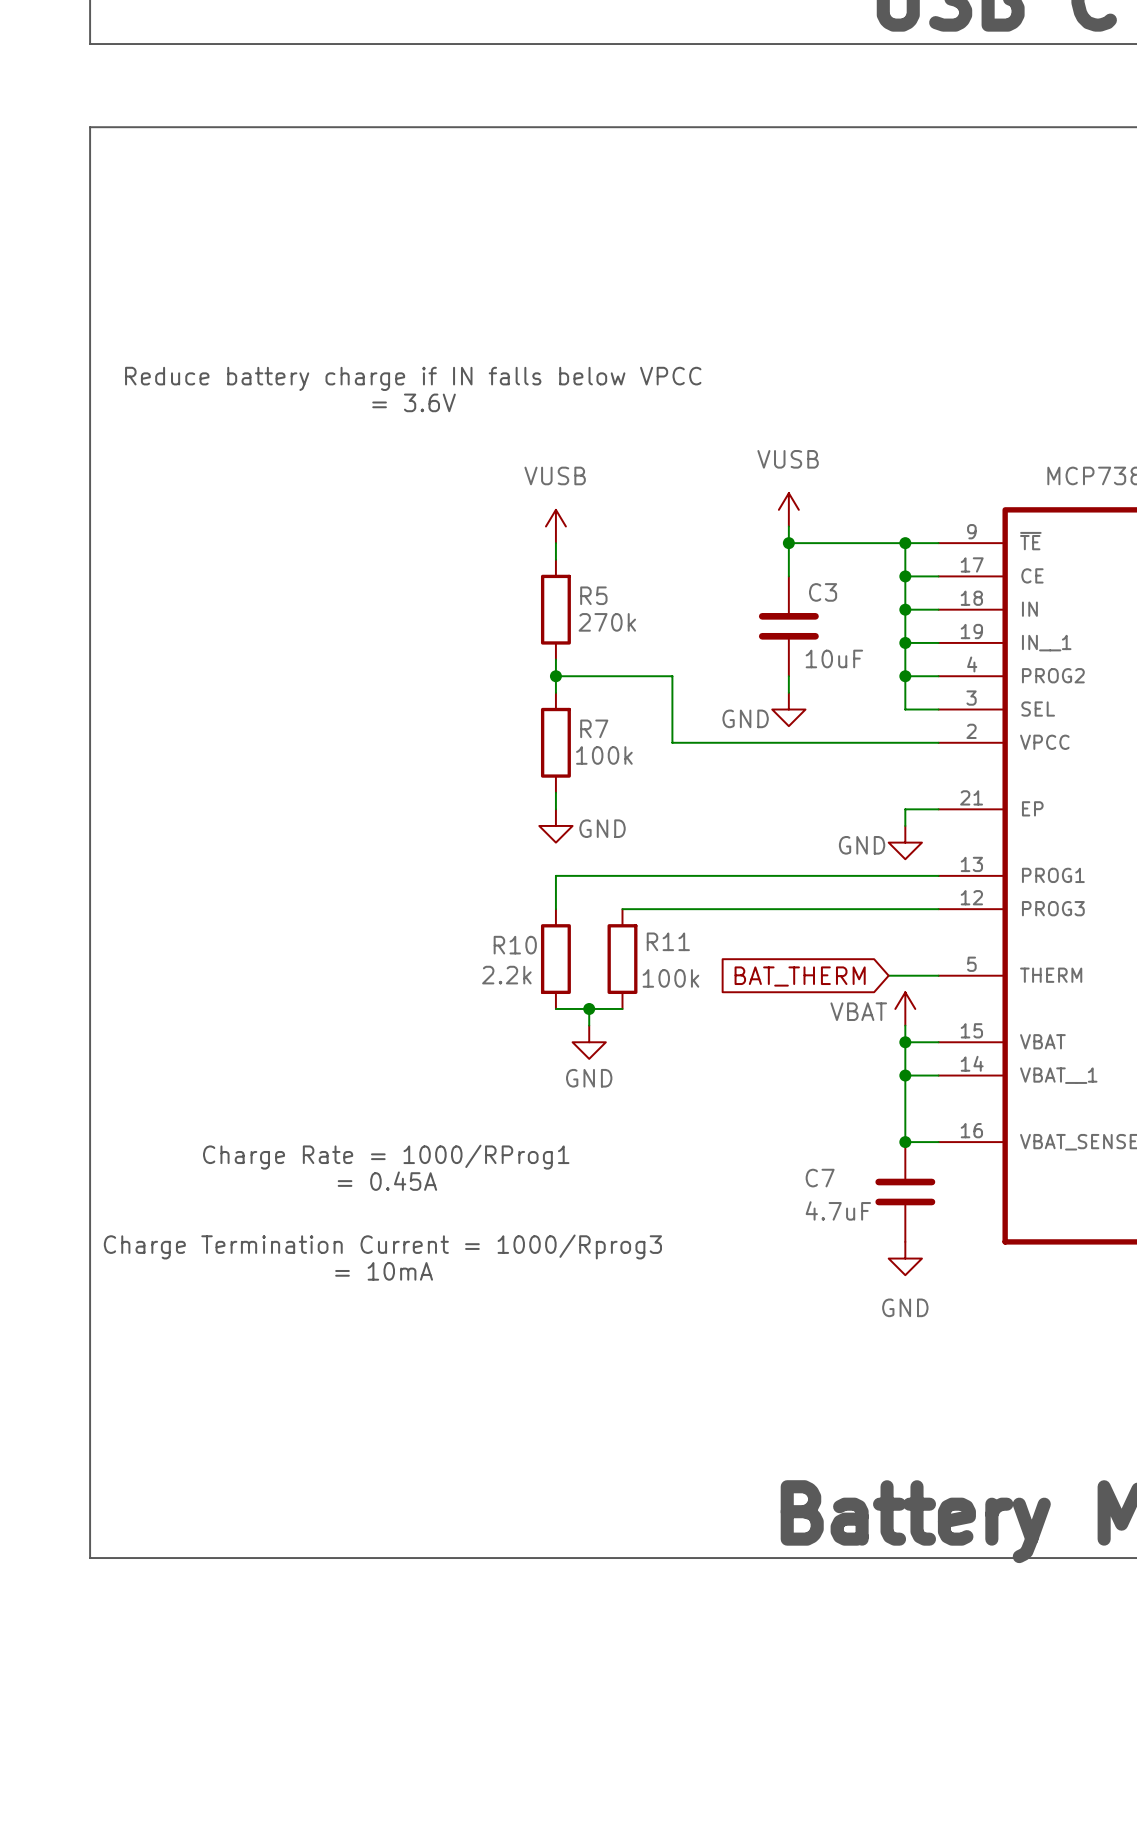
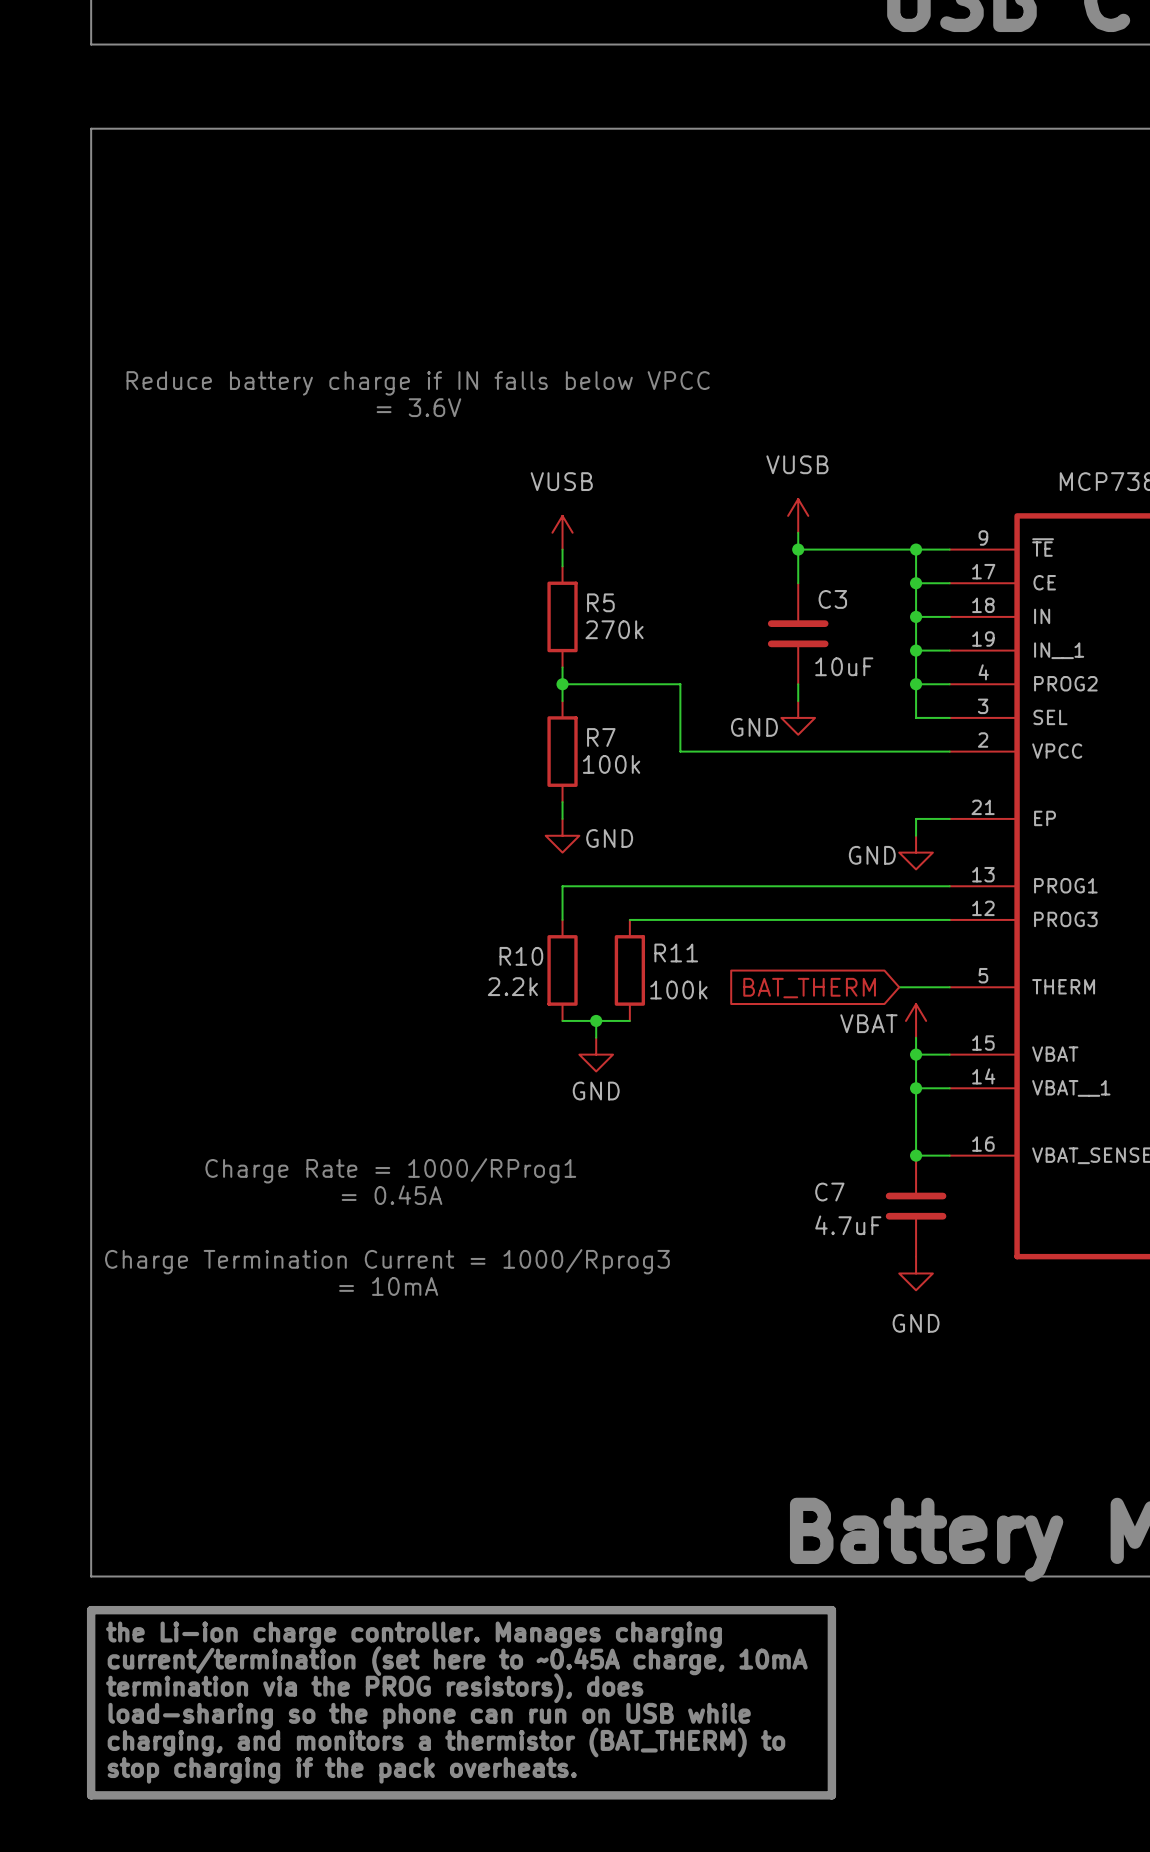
line: none -> (91, 1610) (831, 1610) (831, 1795) (91, 1795) (91, 1610)
text: none -> the Li-ion charge controller. Manages charging (413, 1634)
text: none -> current/termination (set here to ~0.45A charge, 10mA (457, 1661)
text: none -> termination via the PROG resistors), does (374, 1688)
text: none -> load-sharing so the phone can run on USB while (429, 1716)
text: none -> charging, and monitors a thermistor (BAT_THERM) to (446, 1742)
text: none -> stop charging if the pack overheats. (342, 1770)

